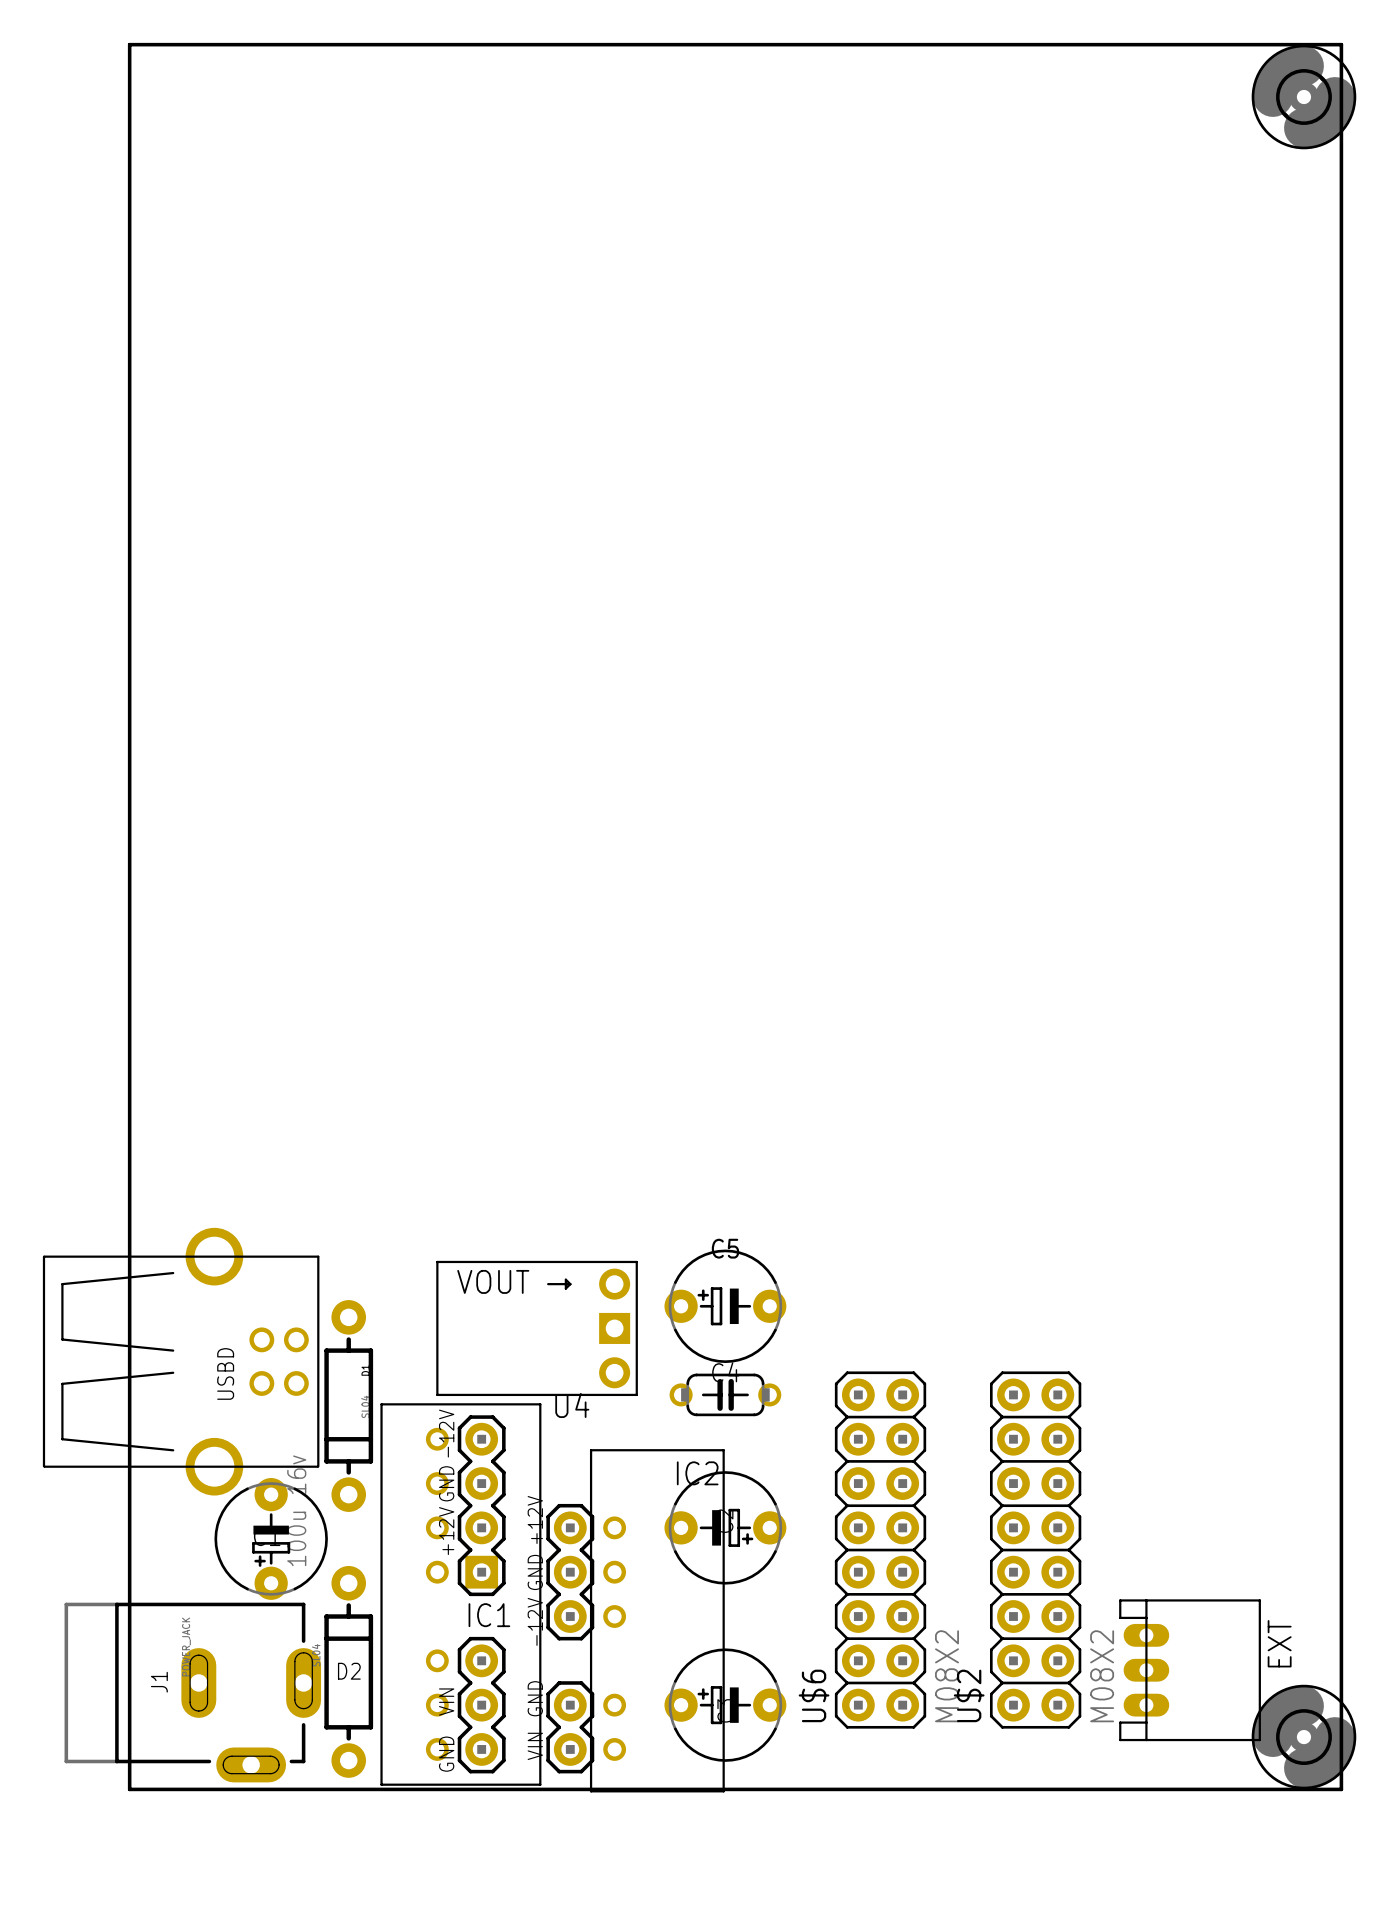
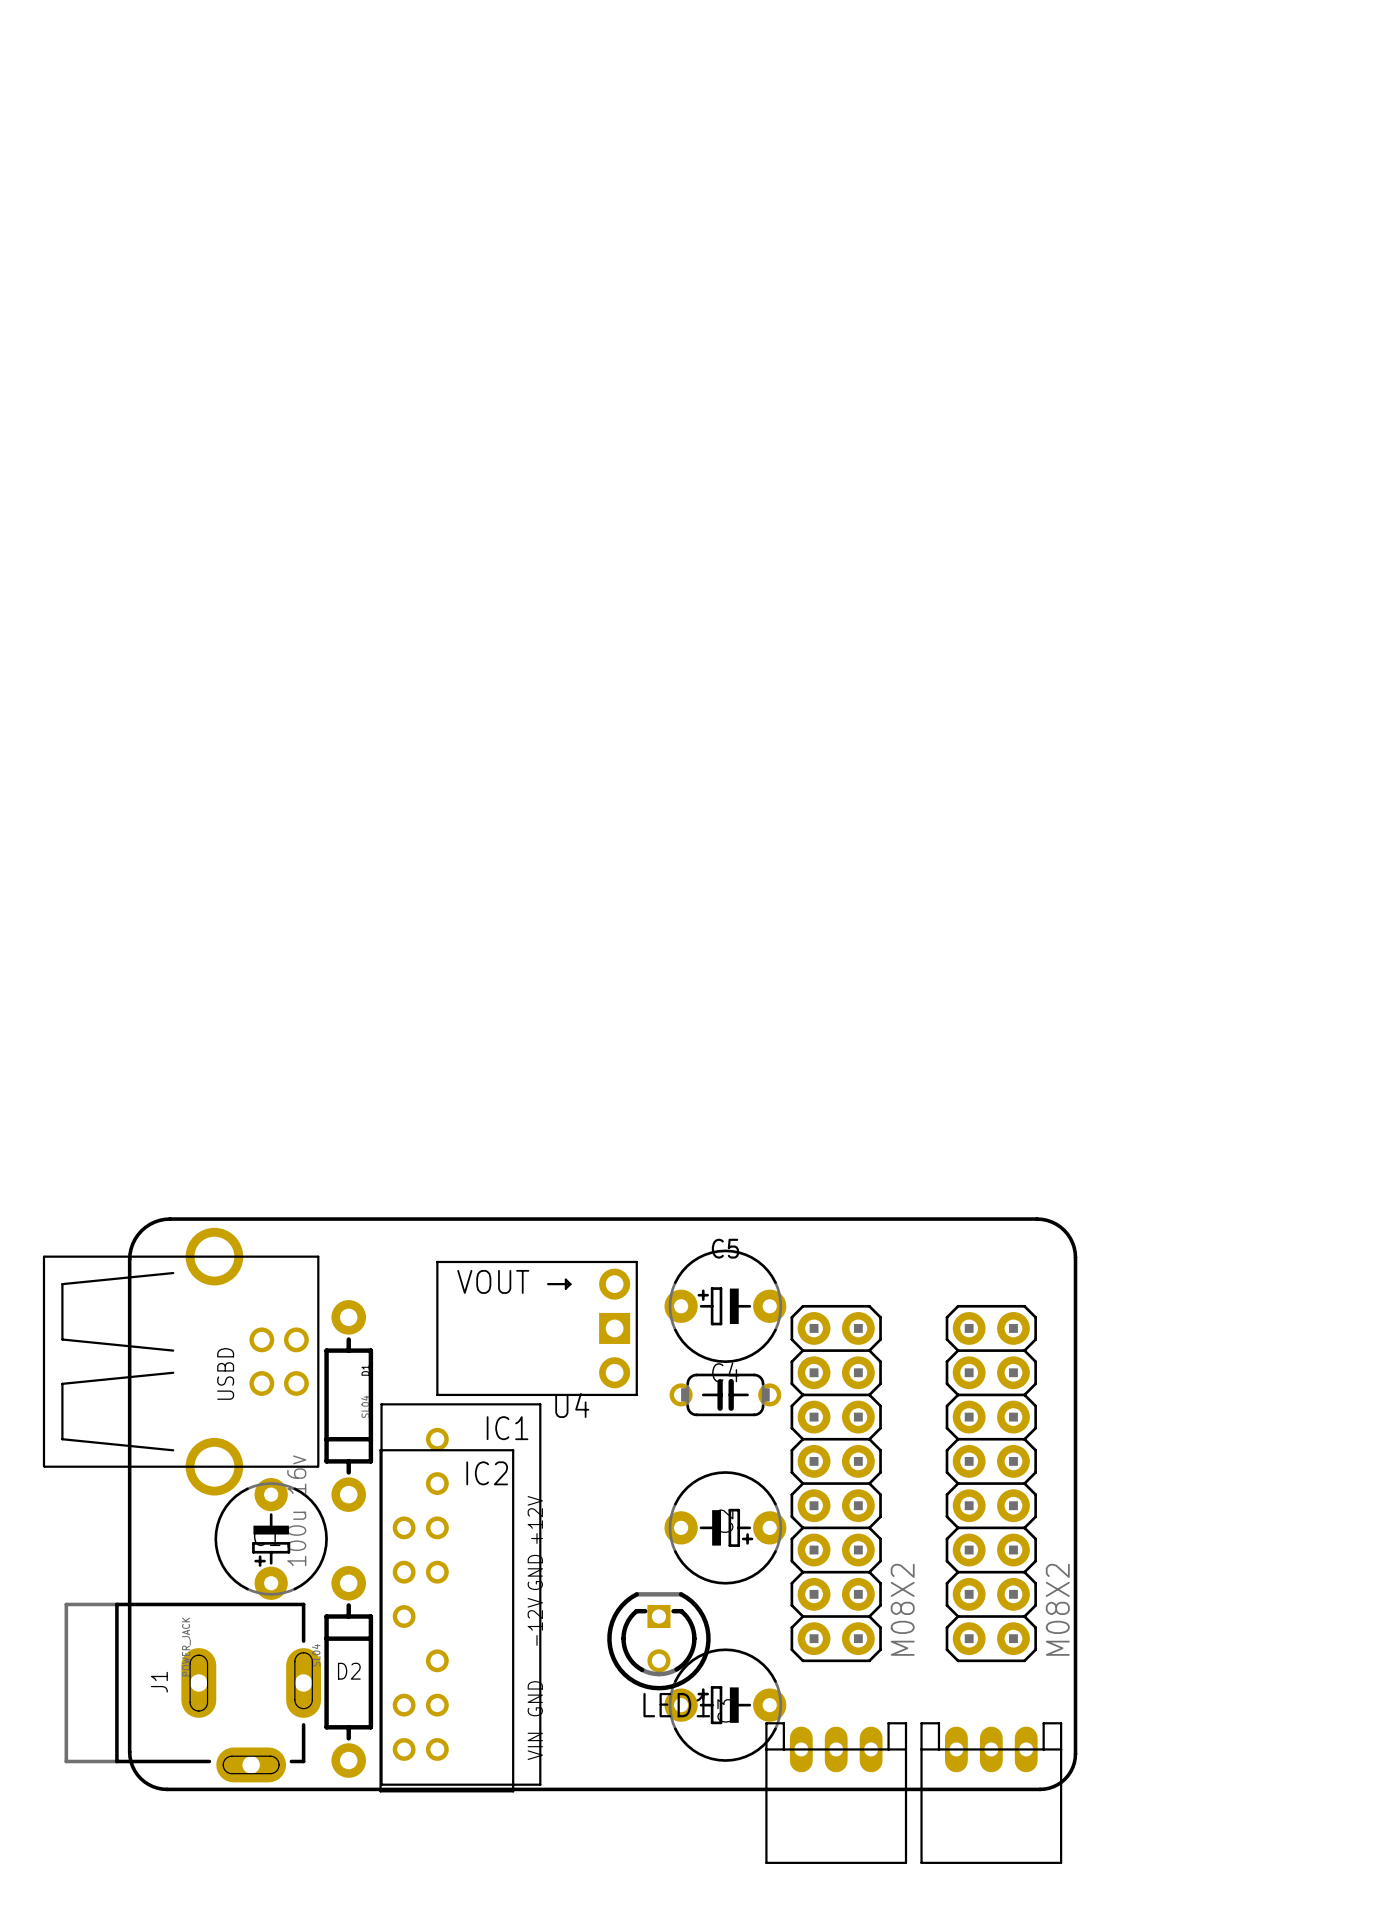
part: (1303, 97) -> none
board edge: (129, 1259) (129, 44) (1341, 44) (1341, 1789) (1039, 1789) -> (129, 1259) (132, 1243) (141, 1230) (154, 1222) (170, 1219) (1037, 1219) (1056, 1224) (1070, 1238) (1075, 1257) (1075, 1753) (1072, 1767) (1065, 1779) (1053, 1786) (1039, 1789)
text: -12V (446, 1433) -> none
text: GND (446, 1483) -> none
part: none -> M08X2 (836, 1483)
part: none -> M08X2 (991, 1483)
part: (481, 1505) -> none
text: +12V (446, 1531) -> none
U$6: M08X2 (880, 1550) -> none
U$2: M08X2 (1035, 1550) -> none
part: (570, 1572) -> none
IC1 name position: IC1 (489, 1615) -> IC1 (507, 1428)
IC2 position: (657, 1620) -> (446, 1620)
LED1: none -> (658, 1641)
EXT: (1190, 1670) -> none
text: VIN (446, 1702) -> none
part: (481, 1705) -> none
part: (570, 1727) -> none
part: (1303, 1737) -> none
board edge: (129, 1751) (129, 1789) (167, 1789) -> (129, 1751) (132, 1766) (140, 1778) (152, 1786) (167, 1789)
text: GND (446, 1754) -> none
part: none -> (836, 1793)
part: none -> (991, 1793)

